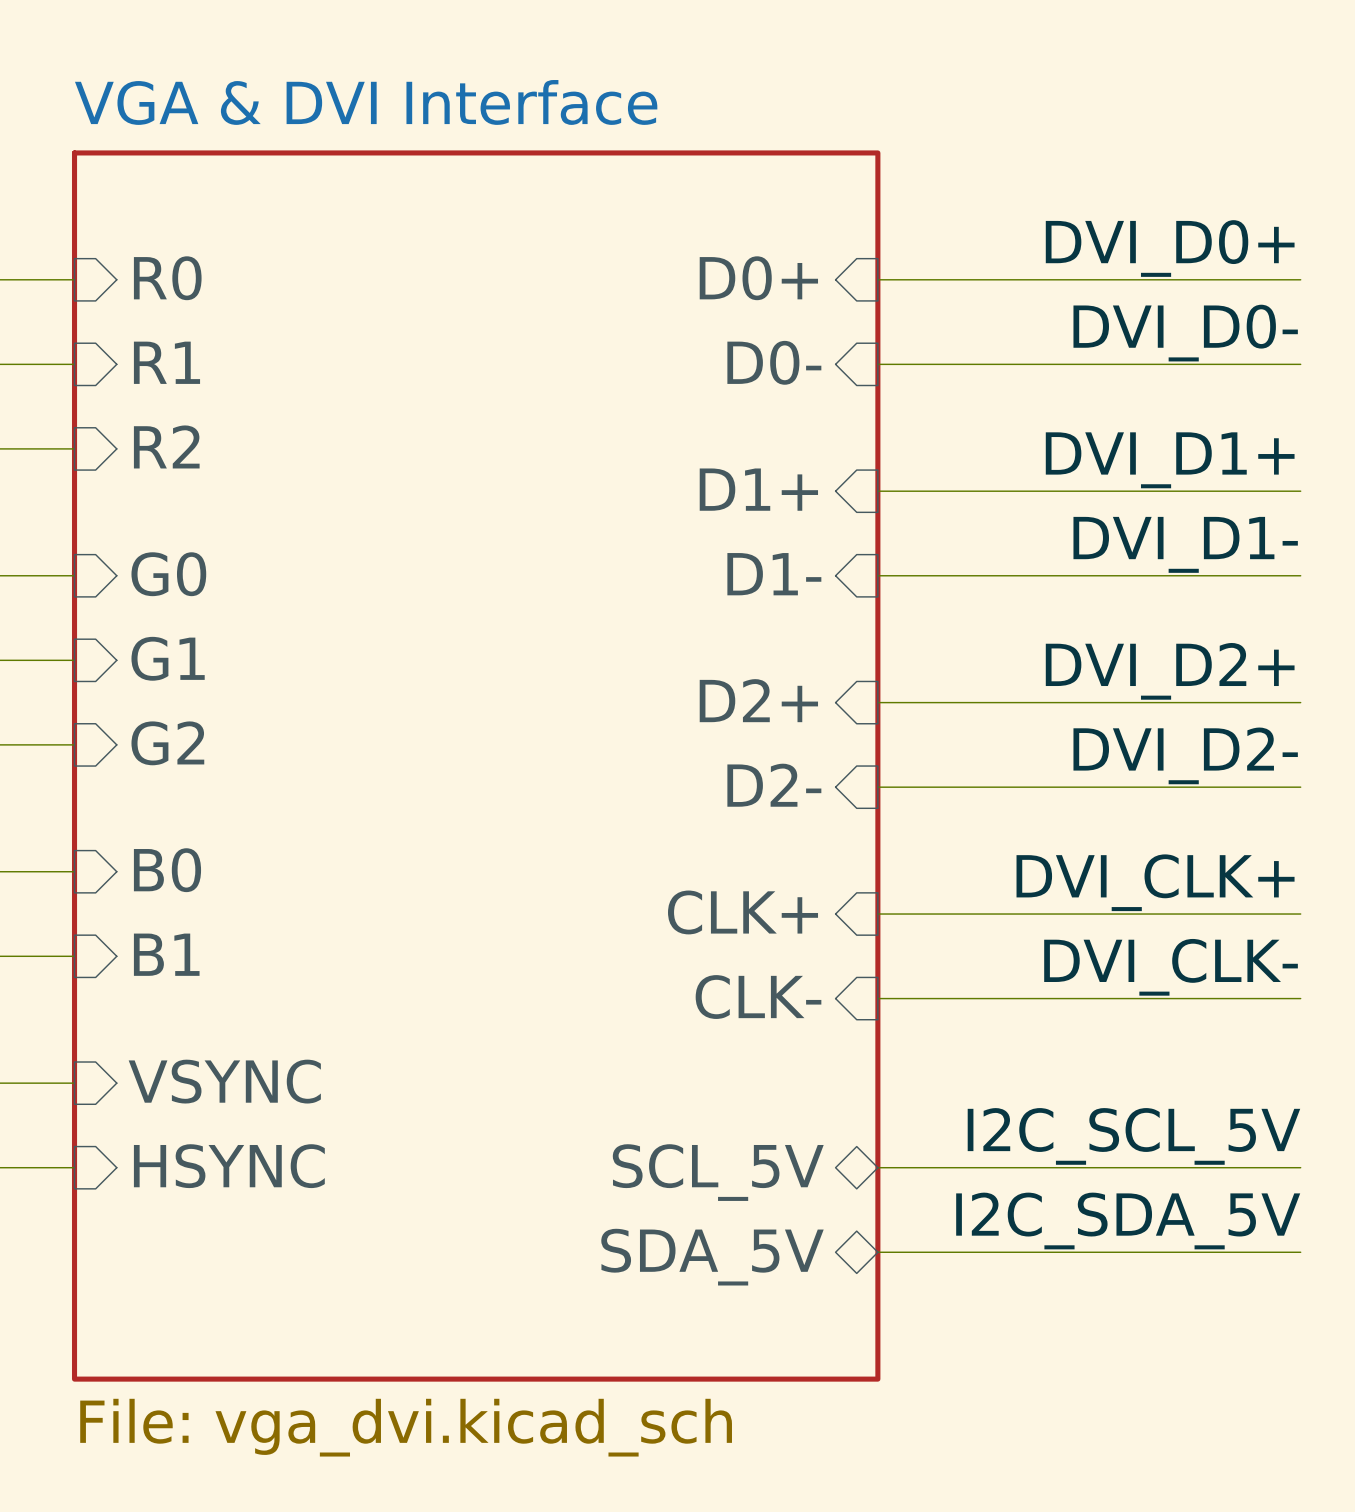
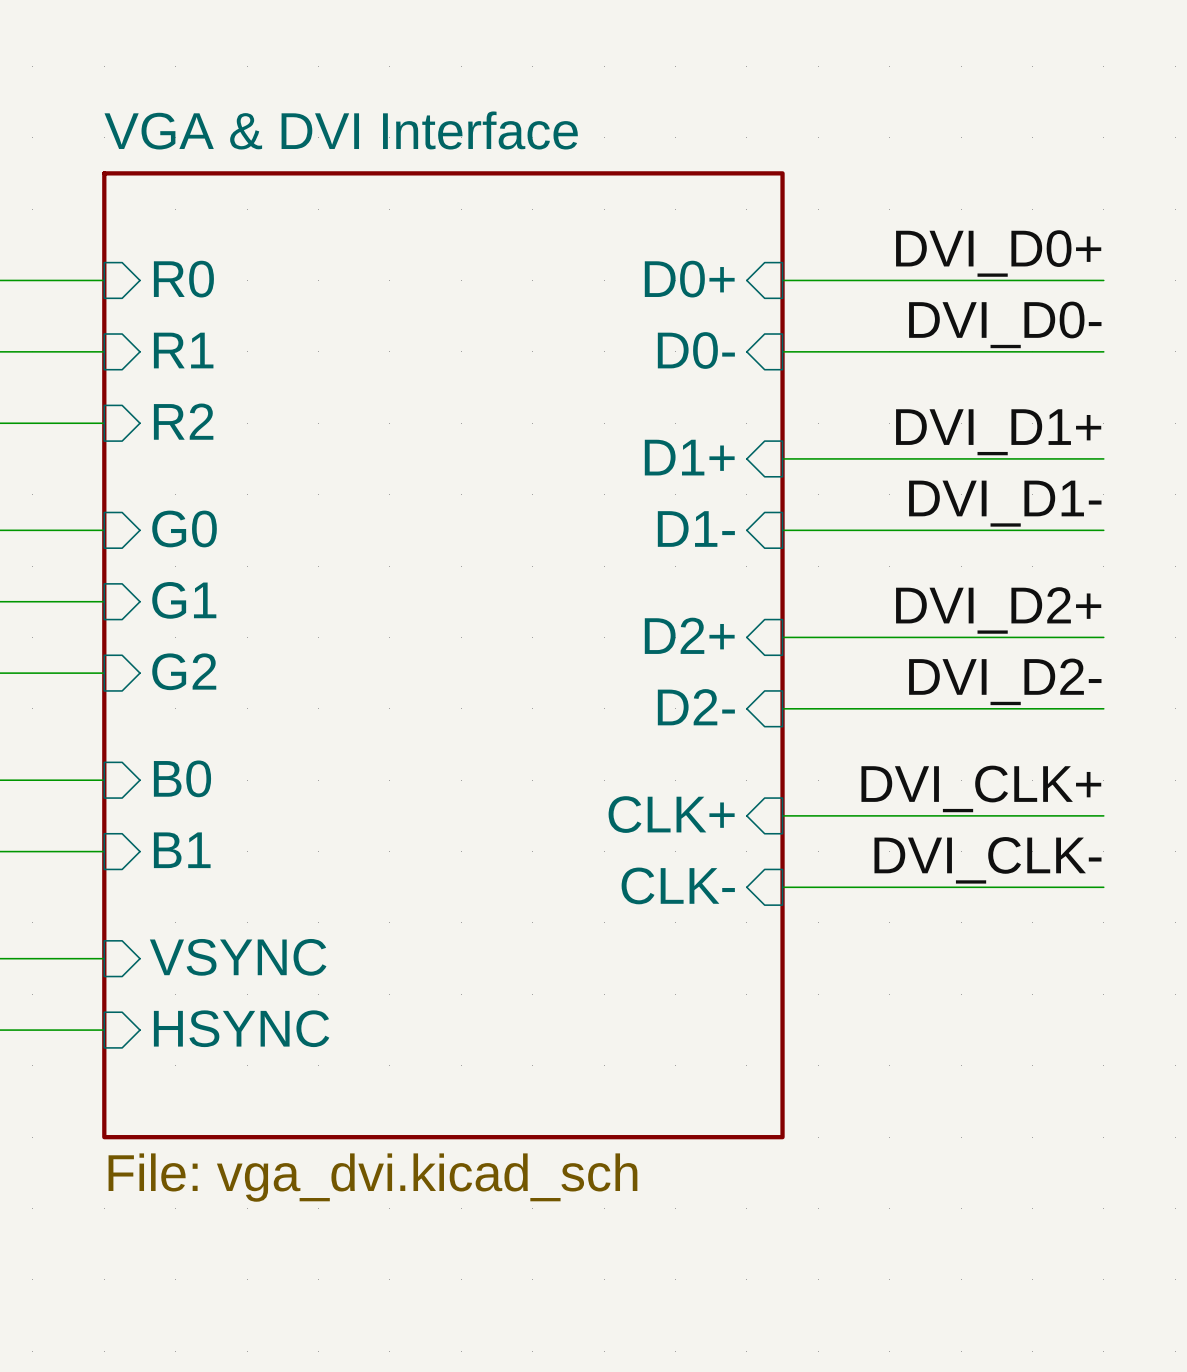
label position: DVI_D0+ (1170, 248) -> DVI_D0+ (998, 253)
wire: (1258, 279) (1300, 279) -> none
label position: DVI_D0- (1185, 333) -> DVI_D0- (1005, 324)
wire: (1258, 364) (1300, 364) -> none
label position: DVI_D1+ (1170, 460) -> DVI_D1+ (998, 432)
wire: (1258, 491) (1300, 491) -> none
label position: DVI_D1- (1185, 544) -> DVI_D1- (1005, 503)
wire: (1258, 575) (1300, 575) -> none
label position: DVI_D2+ (1170, 671) -> DVI_D2+ (998, 610)
wire: (1258, 702) (1300, 702) -> none
sheet VGA & DVI Interface: none -> File: vga_dvi.kicad_sch (443, 655)
label position: DVI_D2- (1185, 755) -> DVI_D2- (1005, 681)
sheet VGA & DVI Interface: File: vga_dvi.kicad_sch (476, 766) -> none
wire: (1258, 787) (1300, 787) -> none
label position: DVI_CLK+ (1155, 882) -> DVI_CLK+ (981, 788)
wire: (1258, 914) (1300, 914) -> none
label position: DVI_CLK- (1171, 967) -> DVI_CLK- (987, 860)
wire: (1258, 998) (1300, 998) -> none
label: I2C_SCL_5V (1133, 1136) -> none
wire: (877, 1167) (1300, 1167) -> none
sheet pin: SCL_5V (718, 1172) -> none
label: I2C_SDA_5V (1128, 1220) -> none
wire: (877, 1252) (1300, 1252) -> none
sheet pin: SDA_5V (712, 1257) -> none

